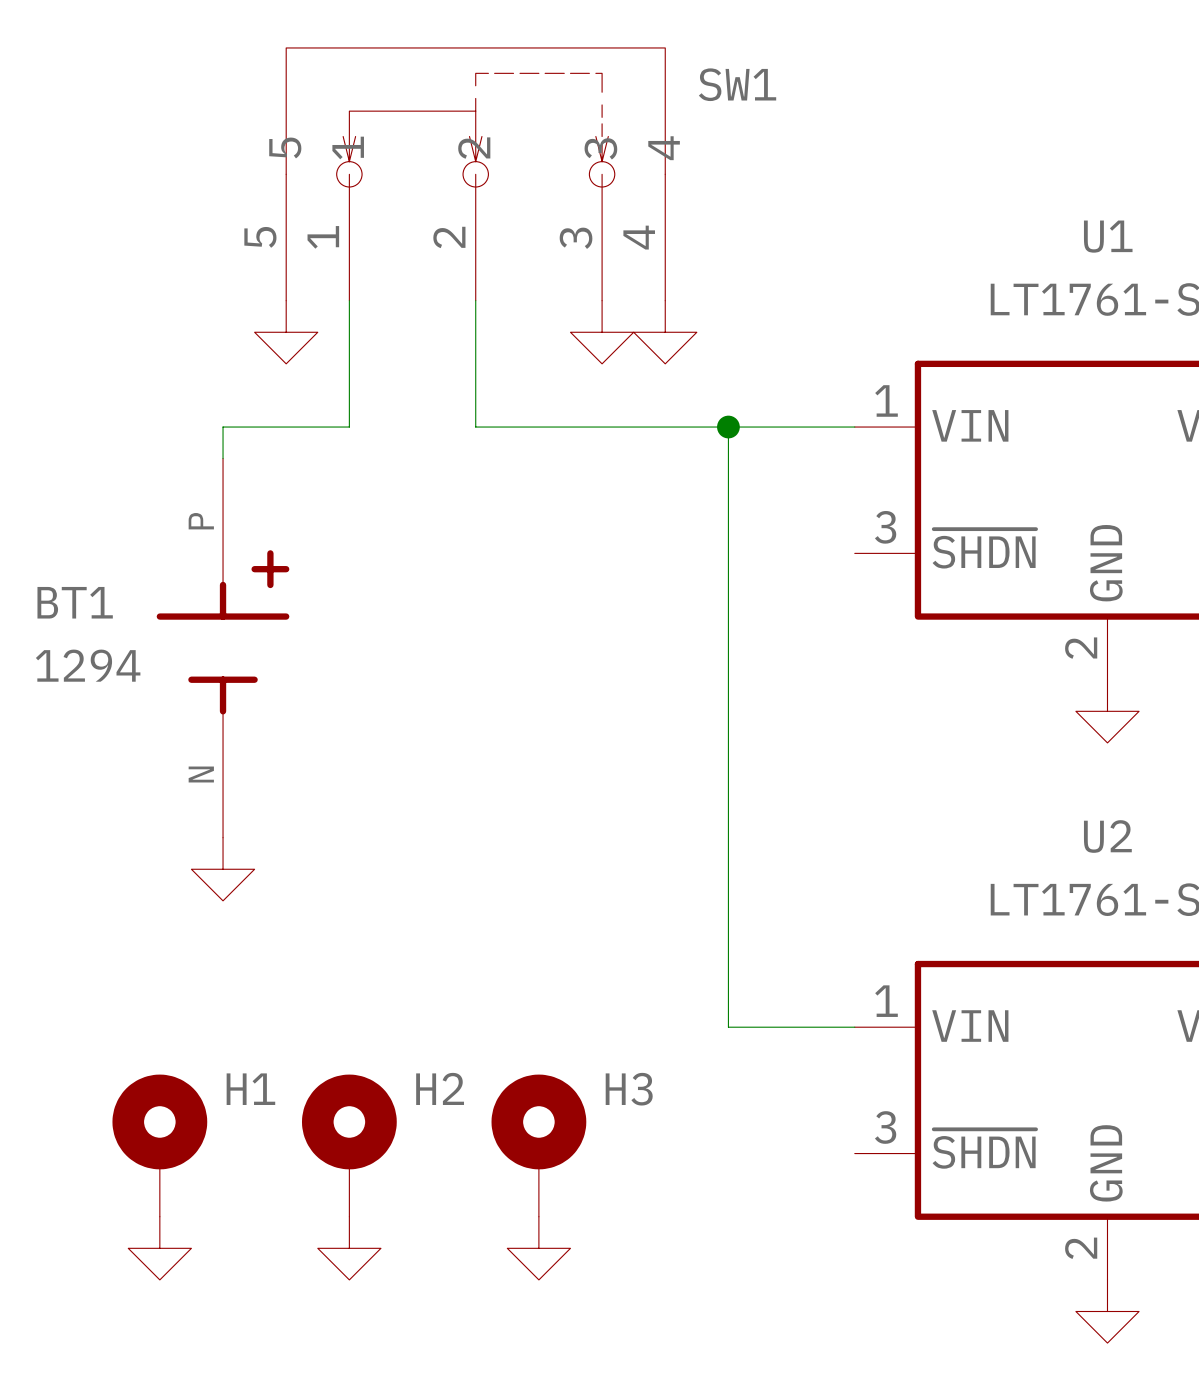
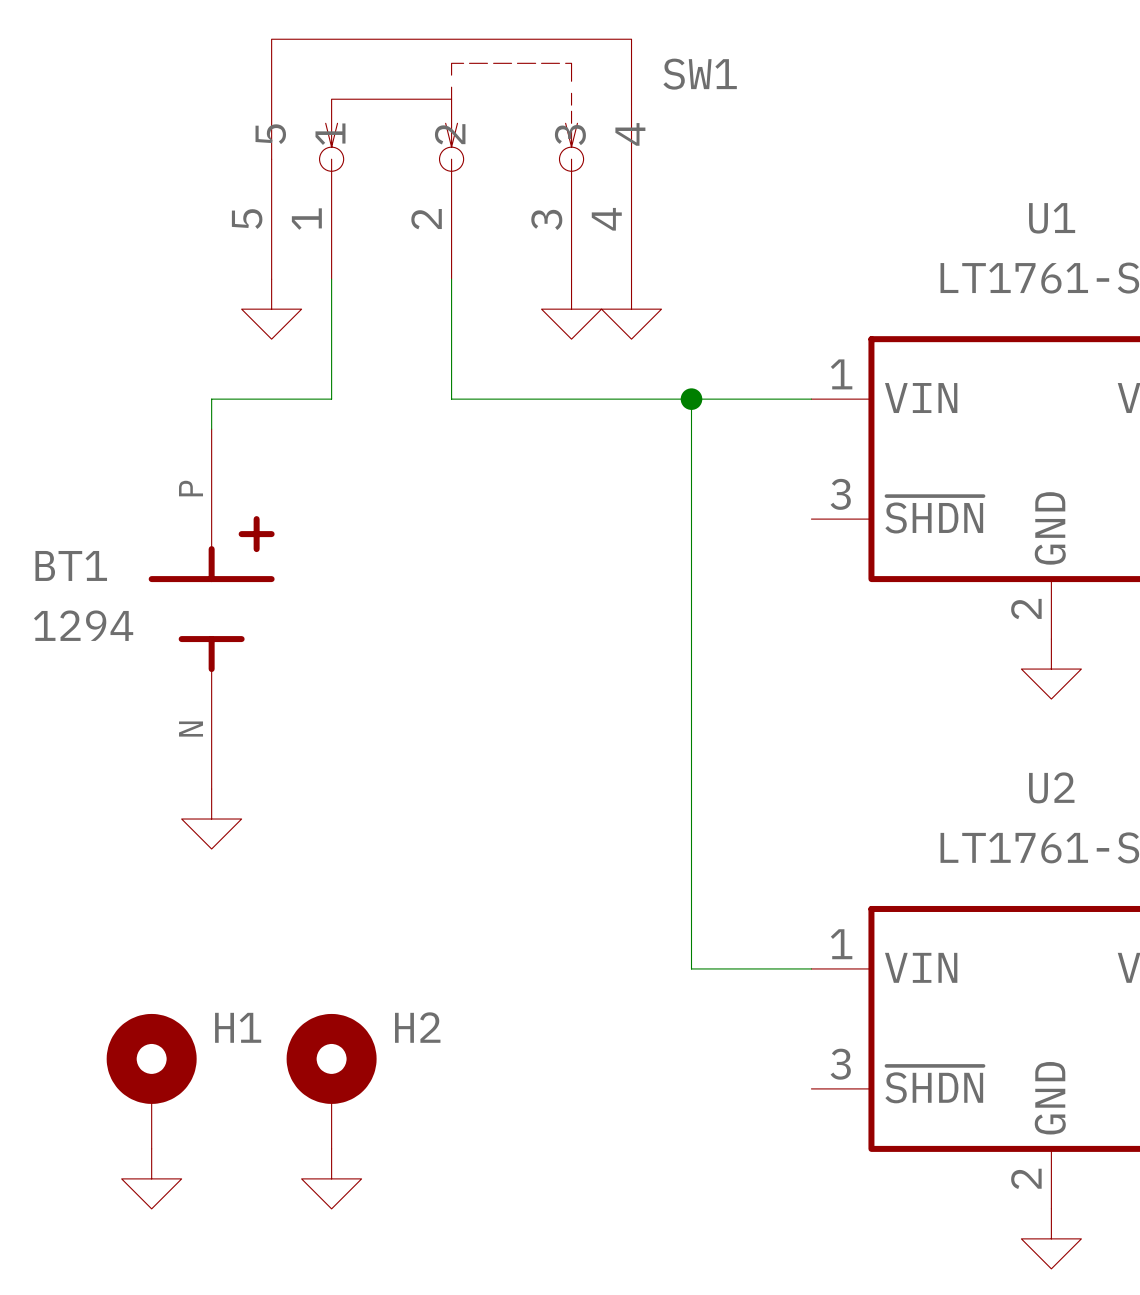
H3: (538, 1145) -> none
power symbol: (538, 1248) -> none

